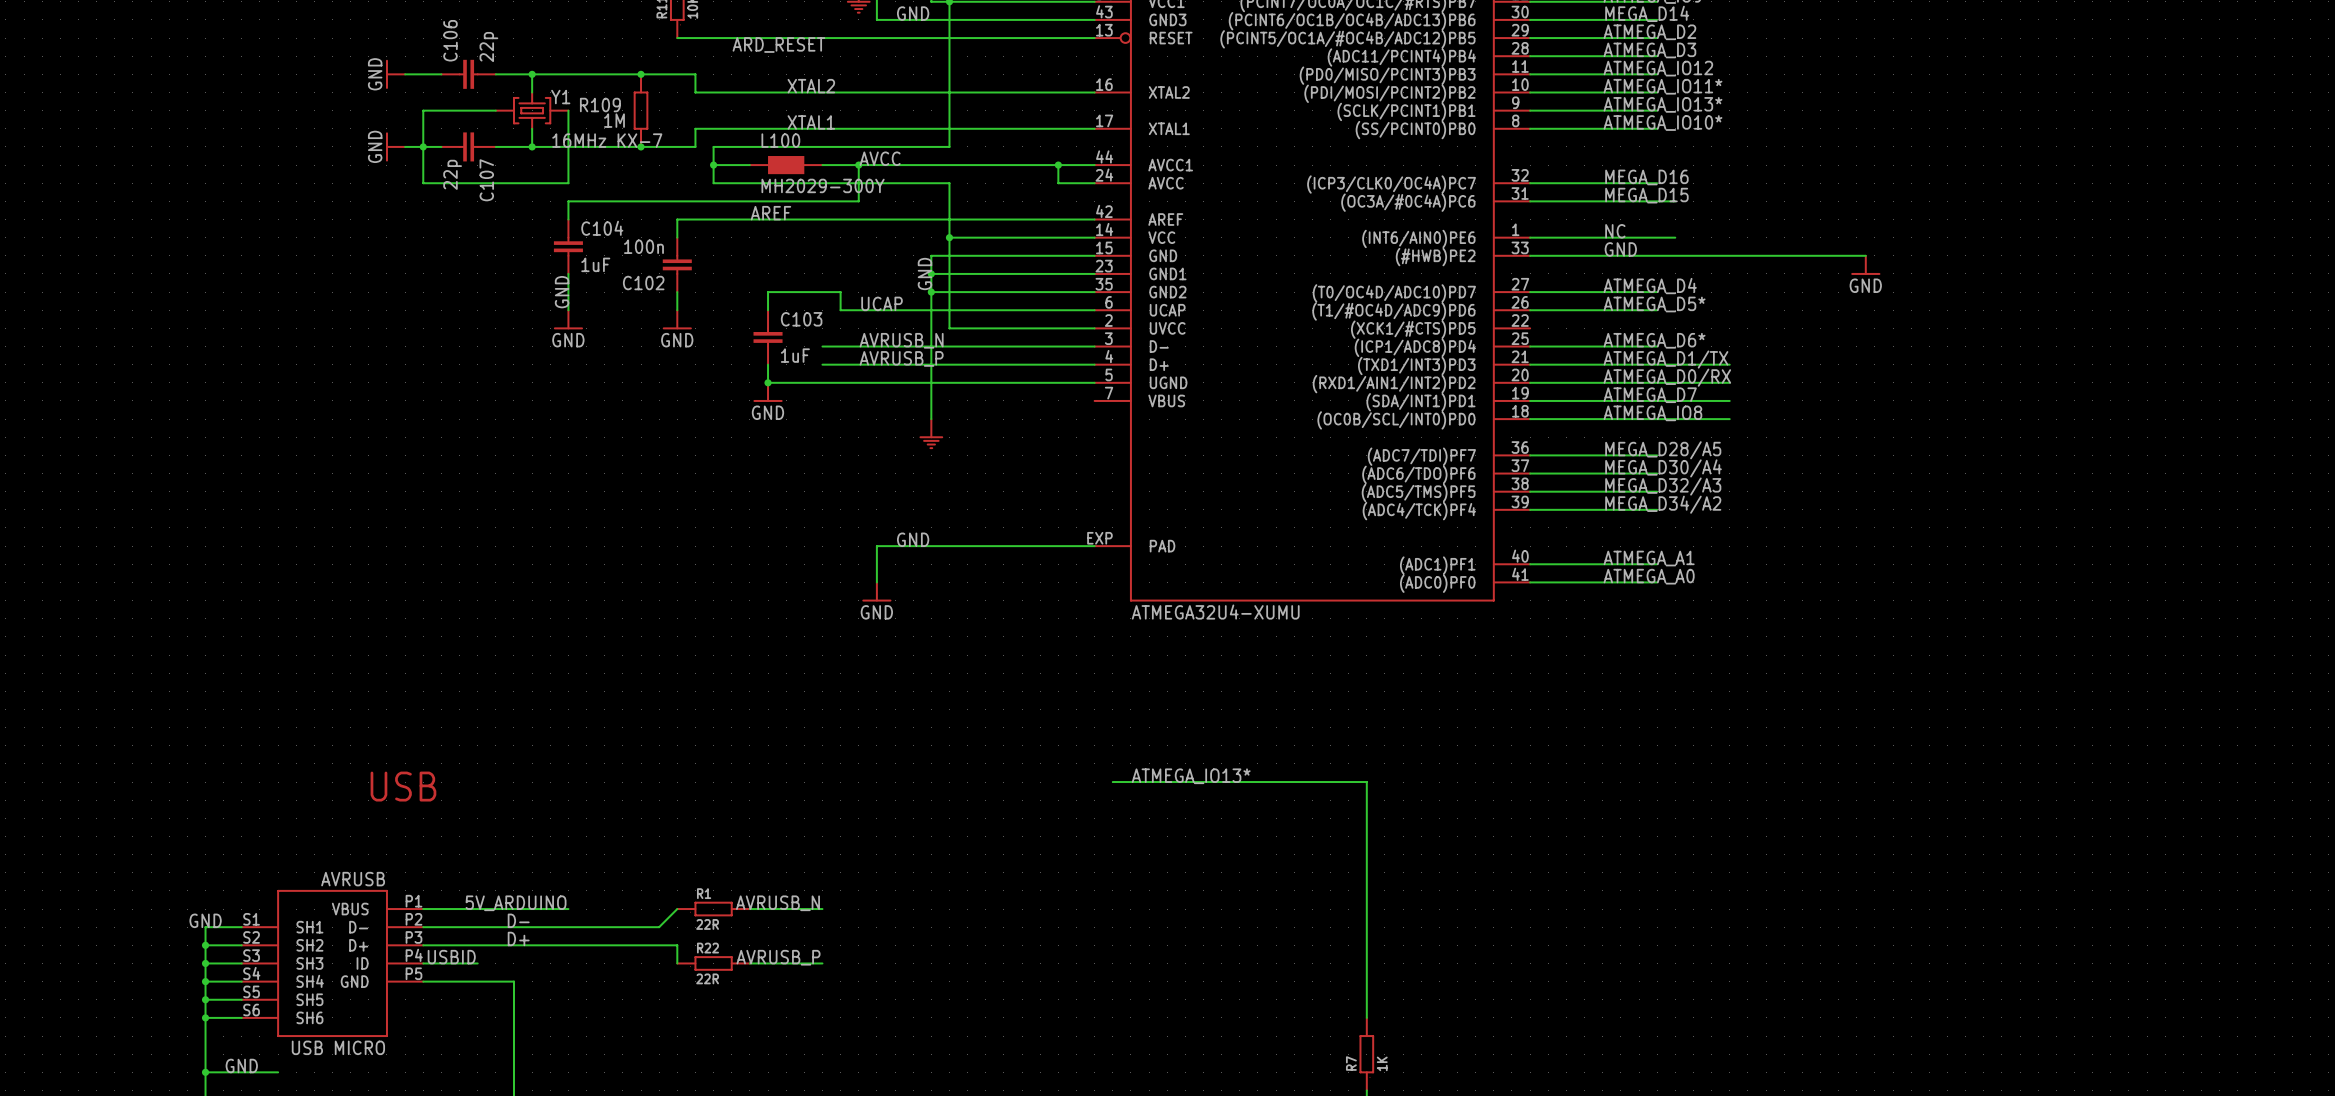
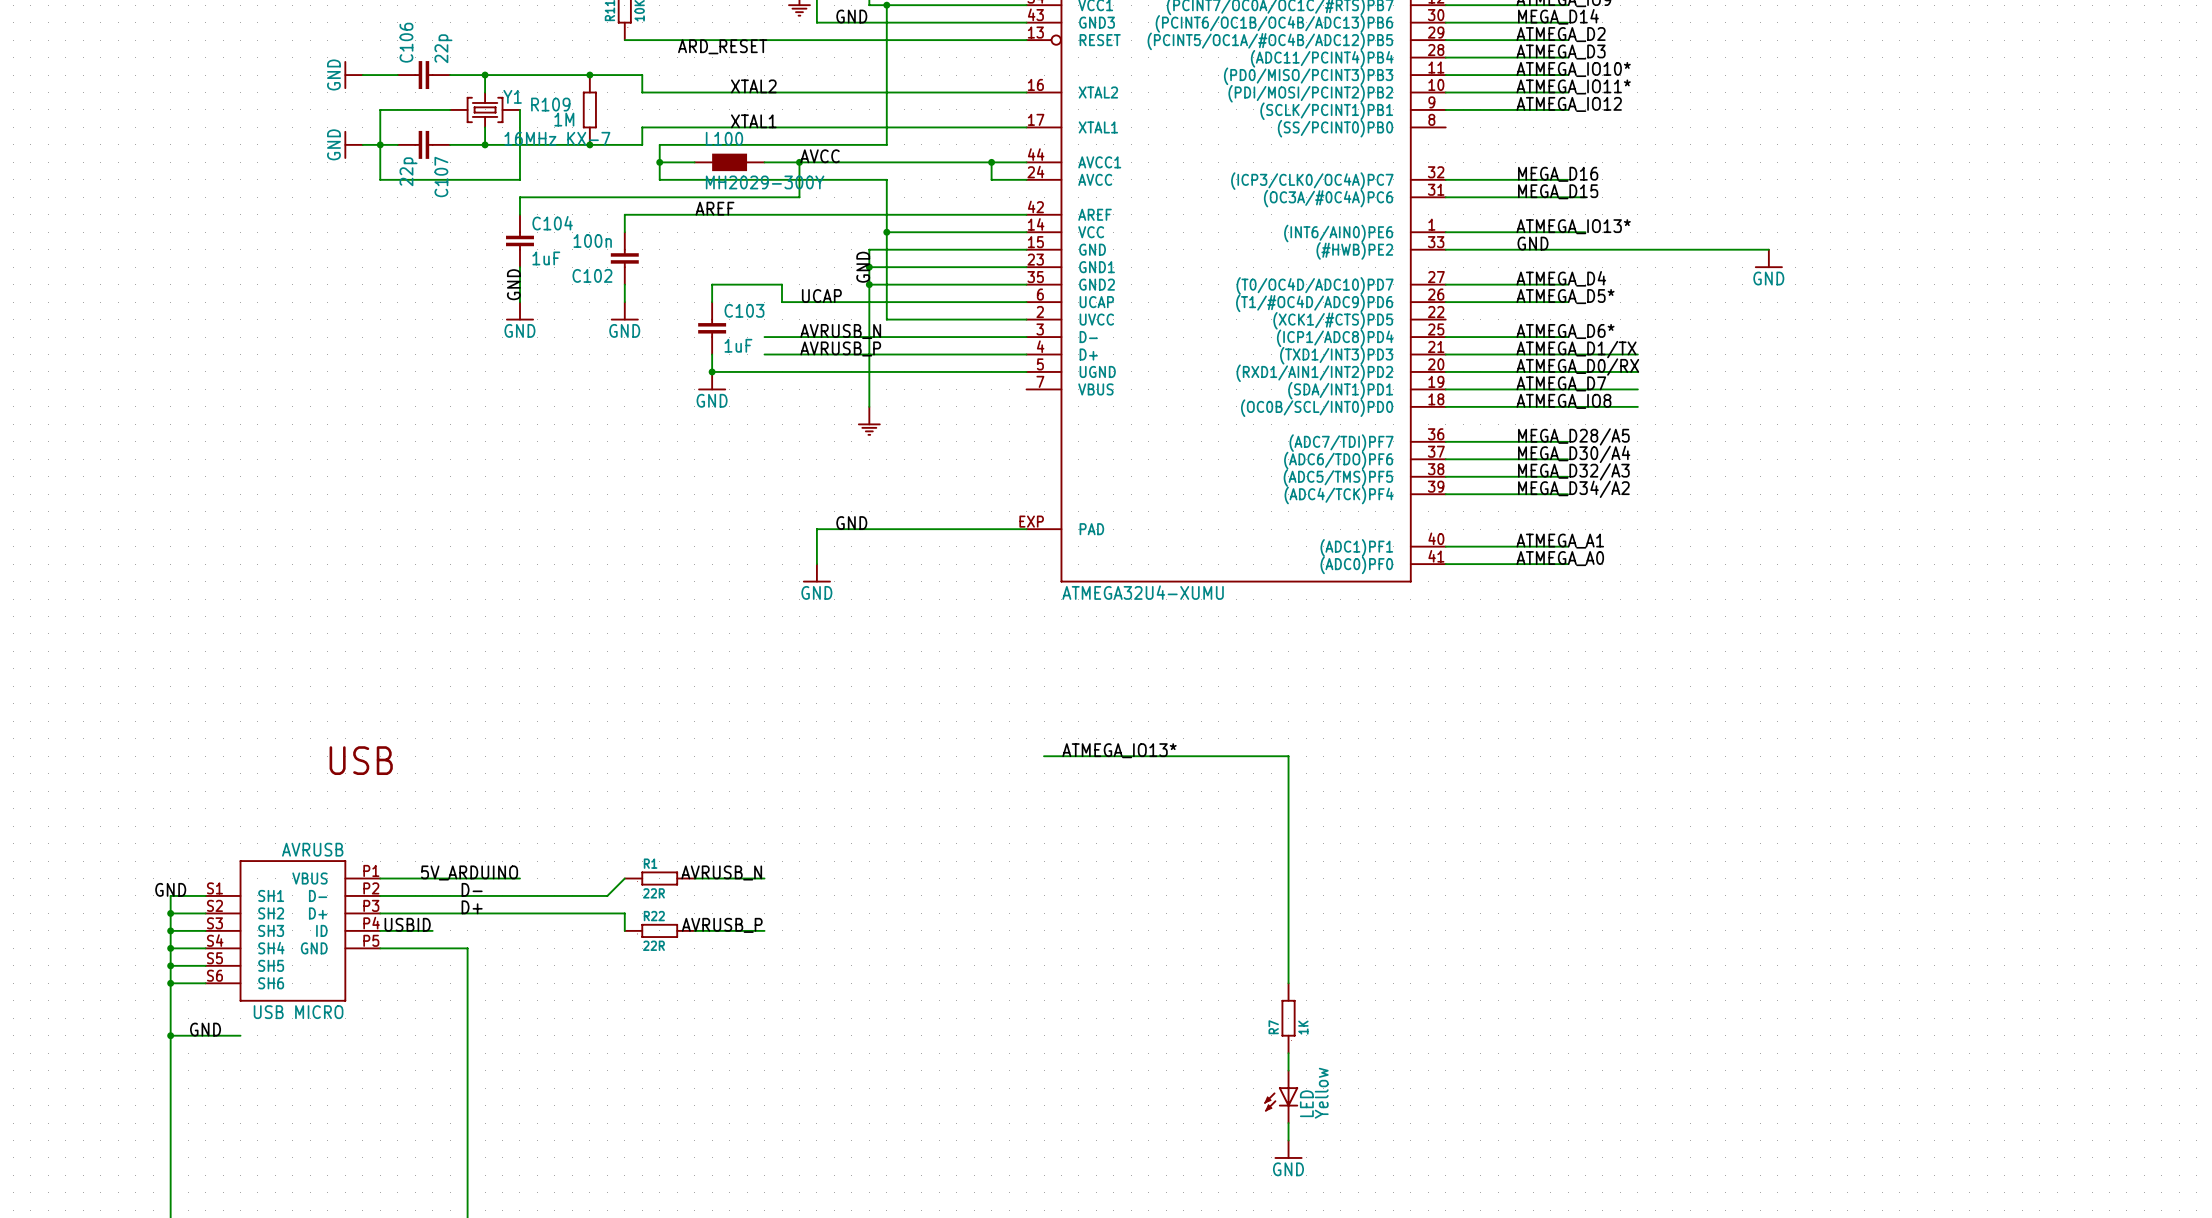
label: ATMEGA_IO12 (1658, 68) -> ATMEGA_IO10* (1573, 69)
label: ATMEGA_IO13* (1662, 104) -> ATMEGA_IO12 (1569, 104)
label: ATMEGA_IO10* (1662, 123) -> none
wire: (1530, 128) (1657, 128) -> none
label: NC (1615, 231) -> ATMEGA_IO13* (1573, 226)

